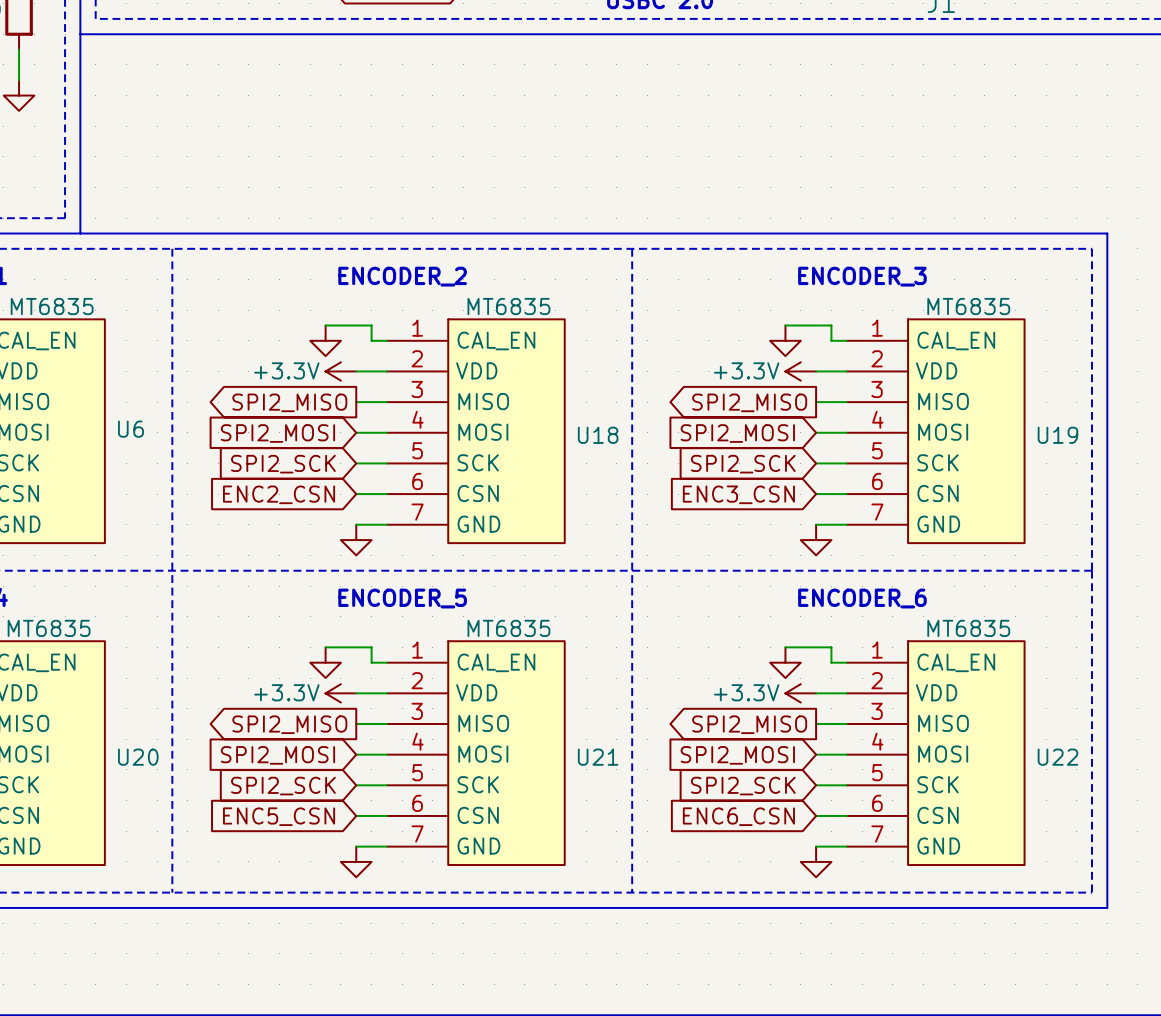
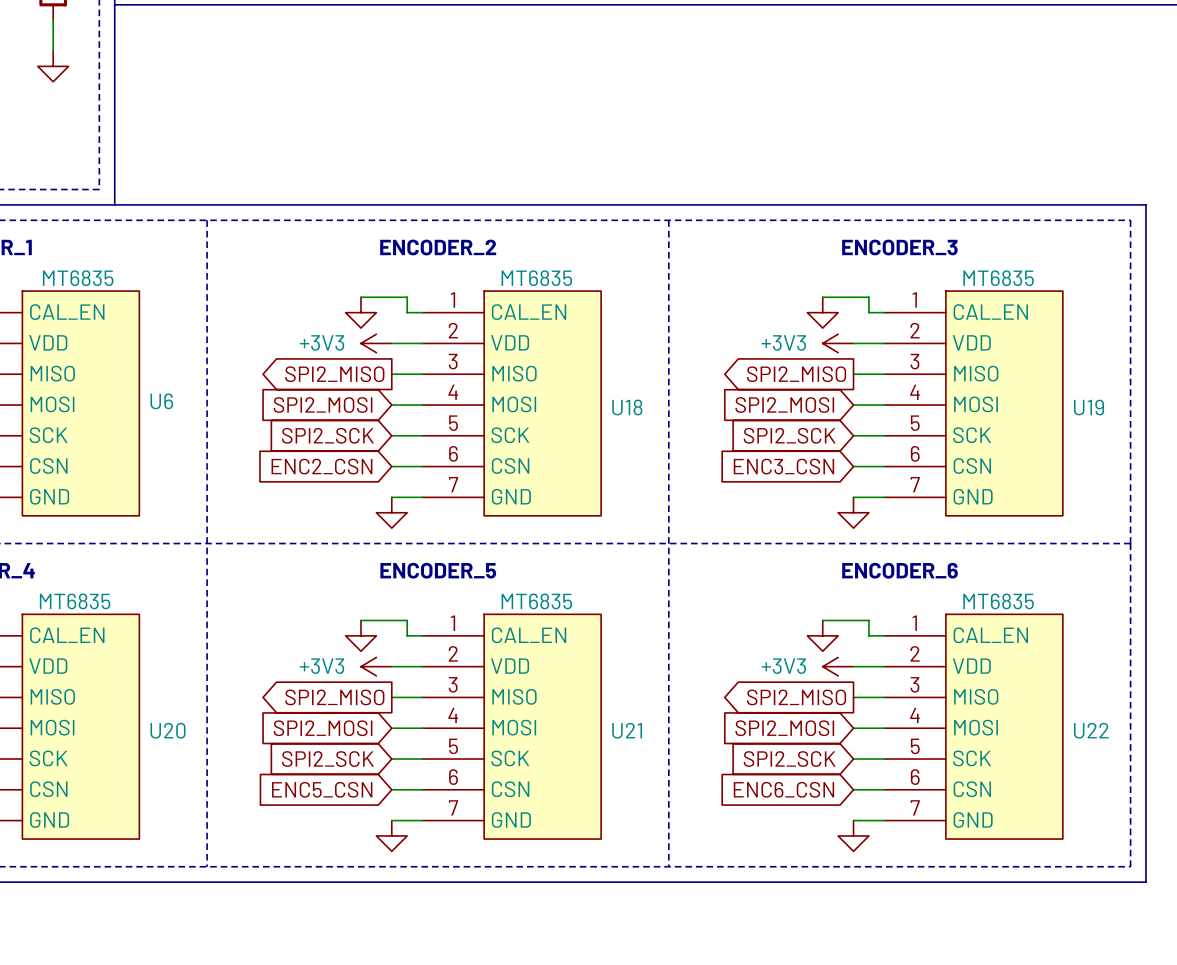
power symbol: +3.3V (340, 371) -> +3V3 (376, 343)
power symbol: +3.3V (800, 371) -> +3V3 (838, 343)
power symbol: +3.3V (340, 693) -> +3V3 (376, 666)
power symbol: +3.3V (800, 693) -> +3V3 (838, 666)

